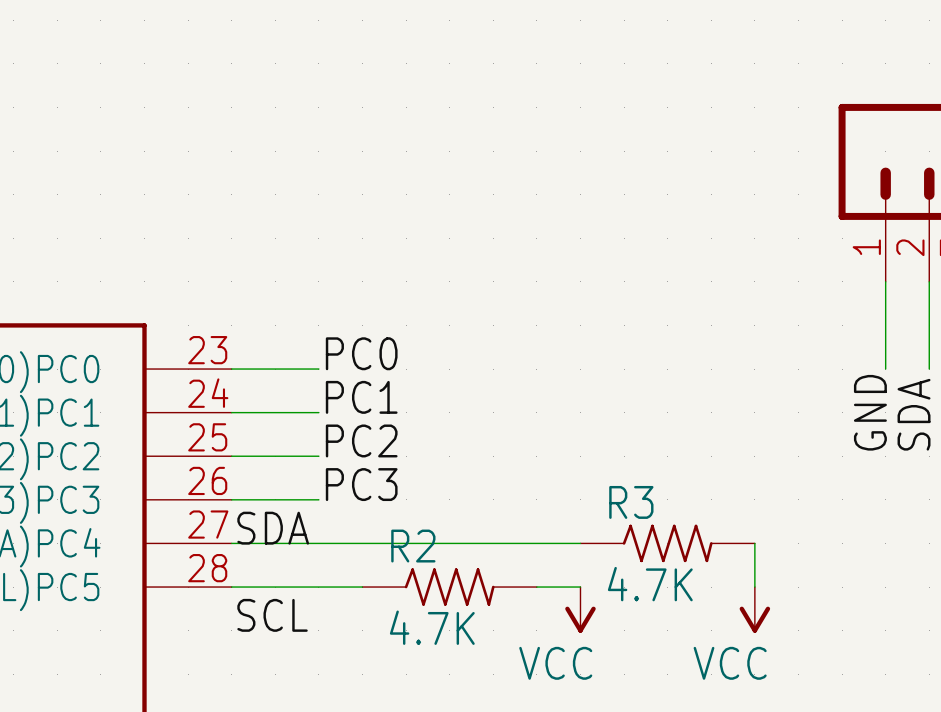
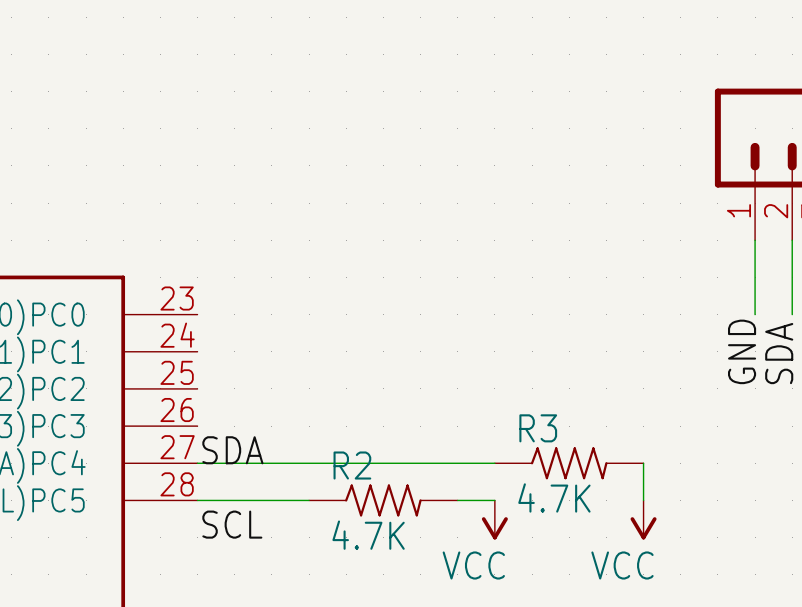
label: PC0 (361, 353) -> none
wire: (231, 369) (318, 369) -> none
label: PC1 (361, 397) -> none
wire: (231, 412) (318, 412) -> none
label: PC2 (361, 440) -> none
wire: (231, 456) (318, 456) -> none
label: PC3 (361, 484) -> none
wire: (231, 499) (318, 499) -> none

